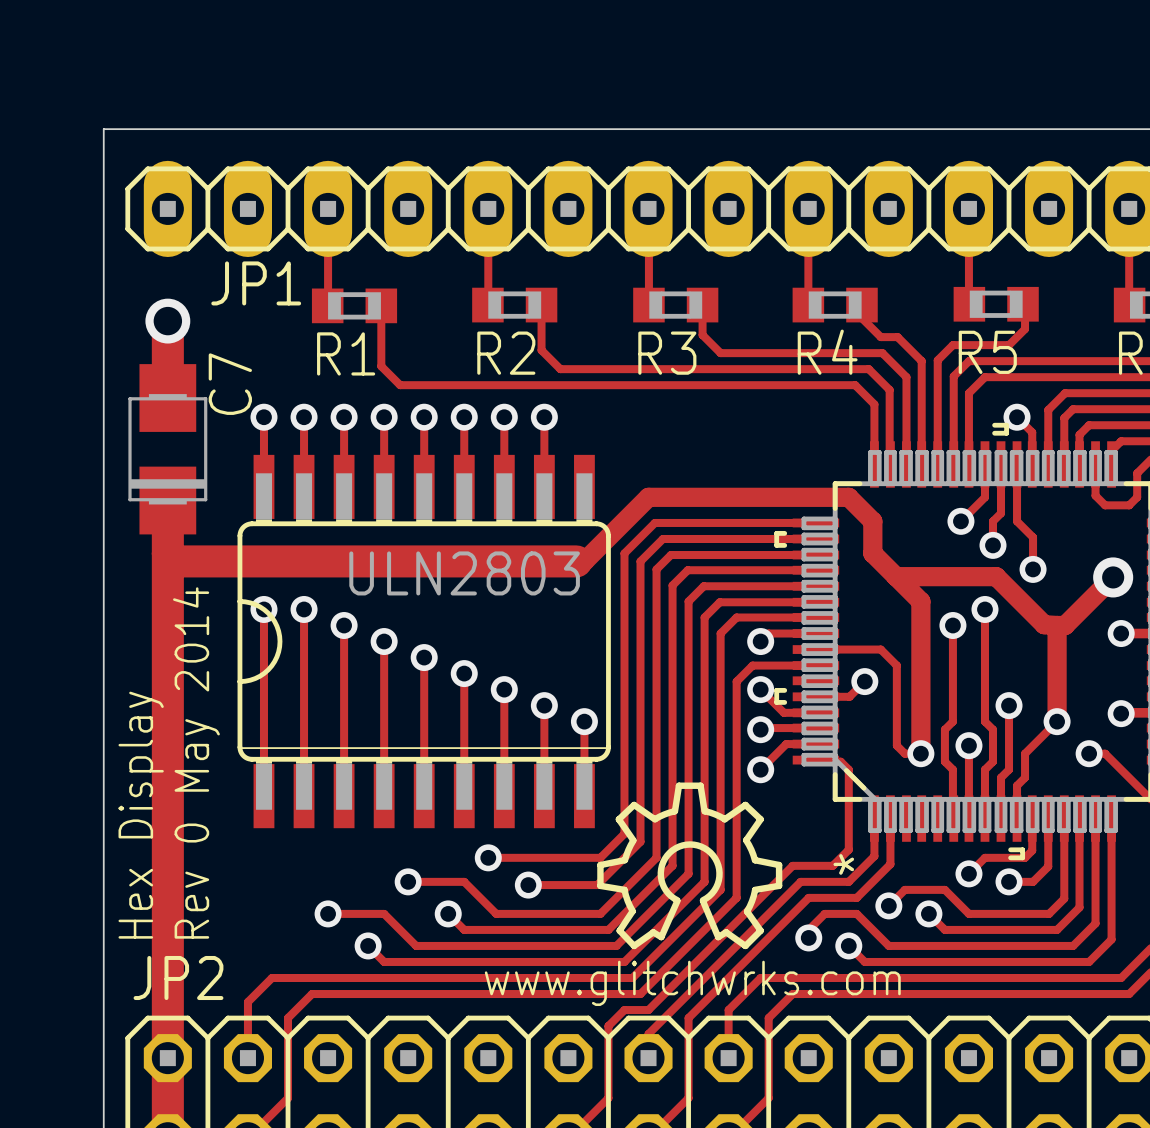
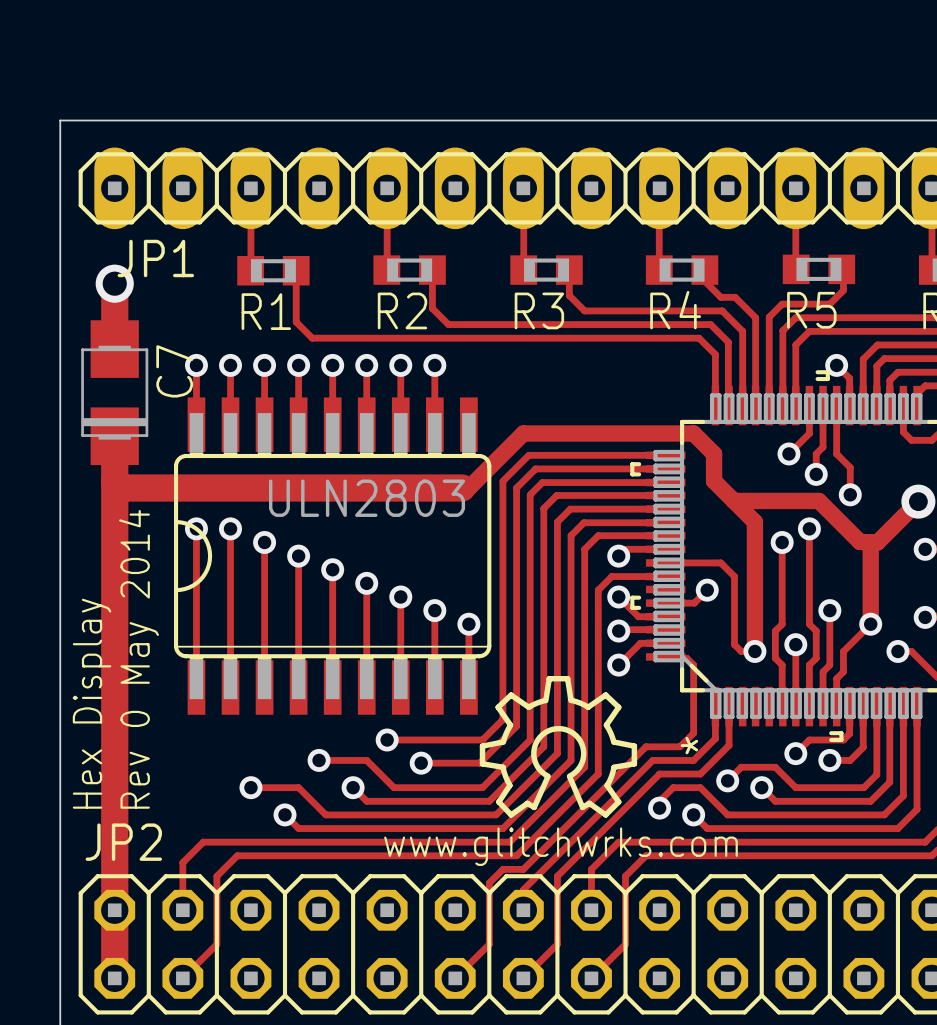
JP1 name position: JP1 (256, 283) -> JP1 (155, 258)
C7 name position: C7 (230, 384) -> C7 (174, 371)

